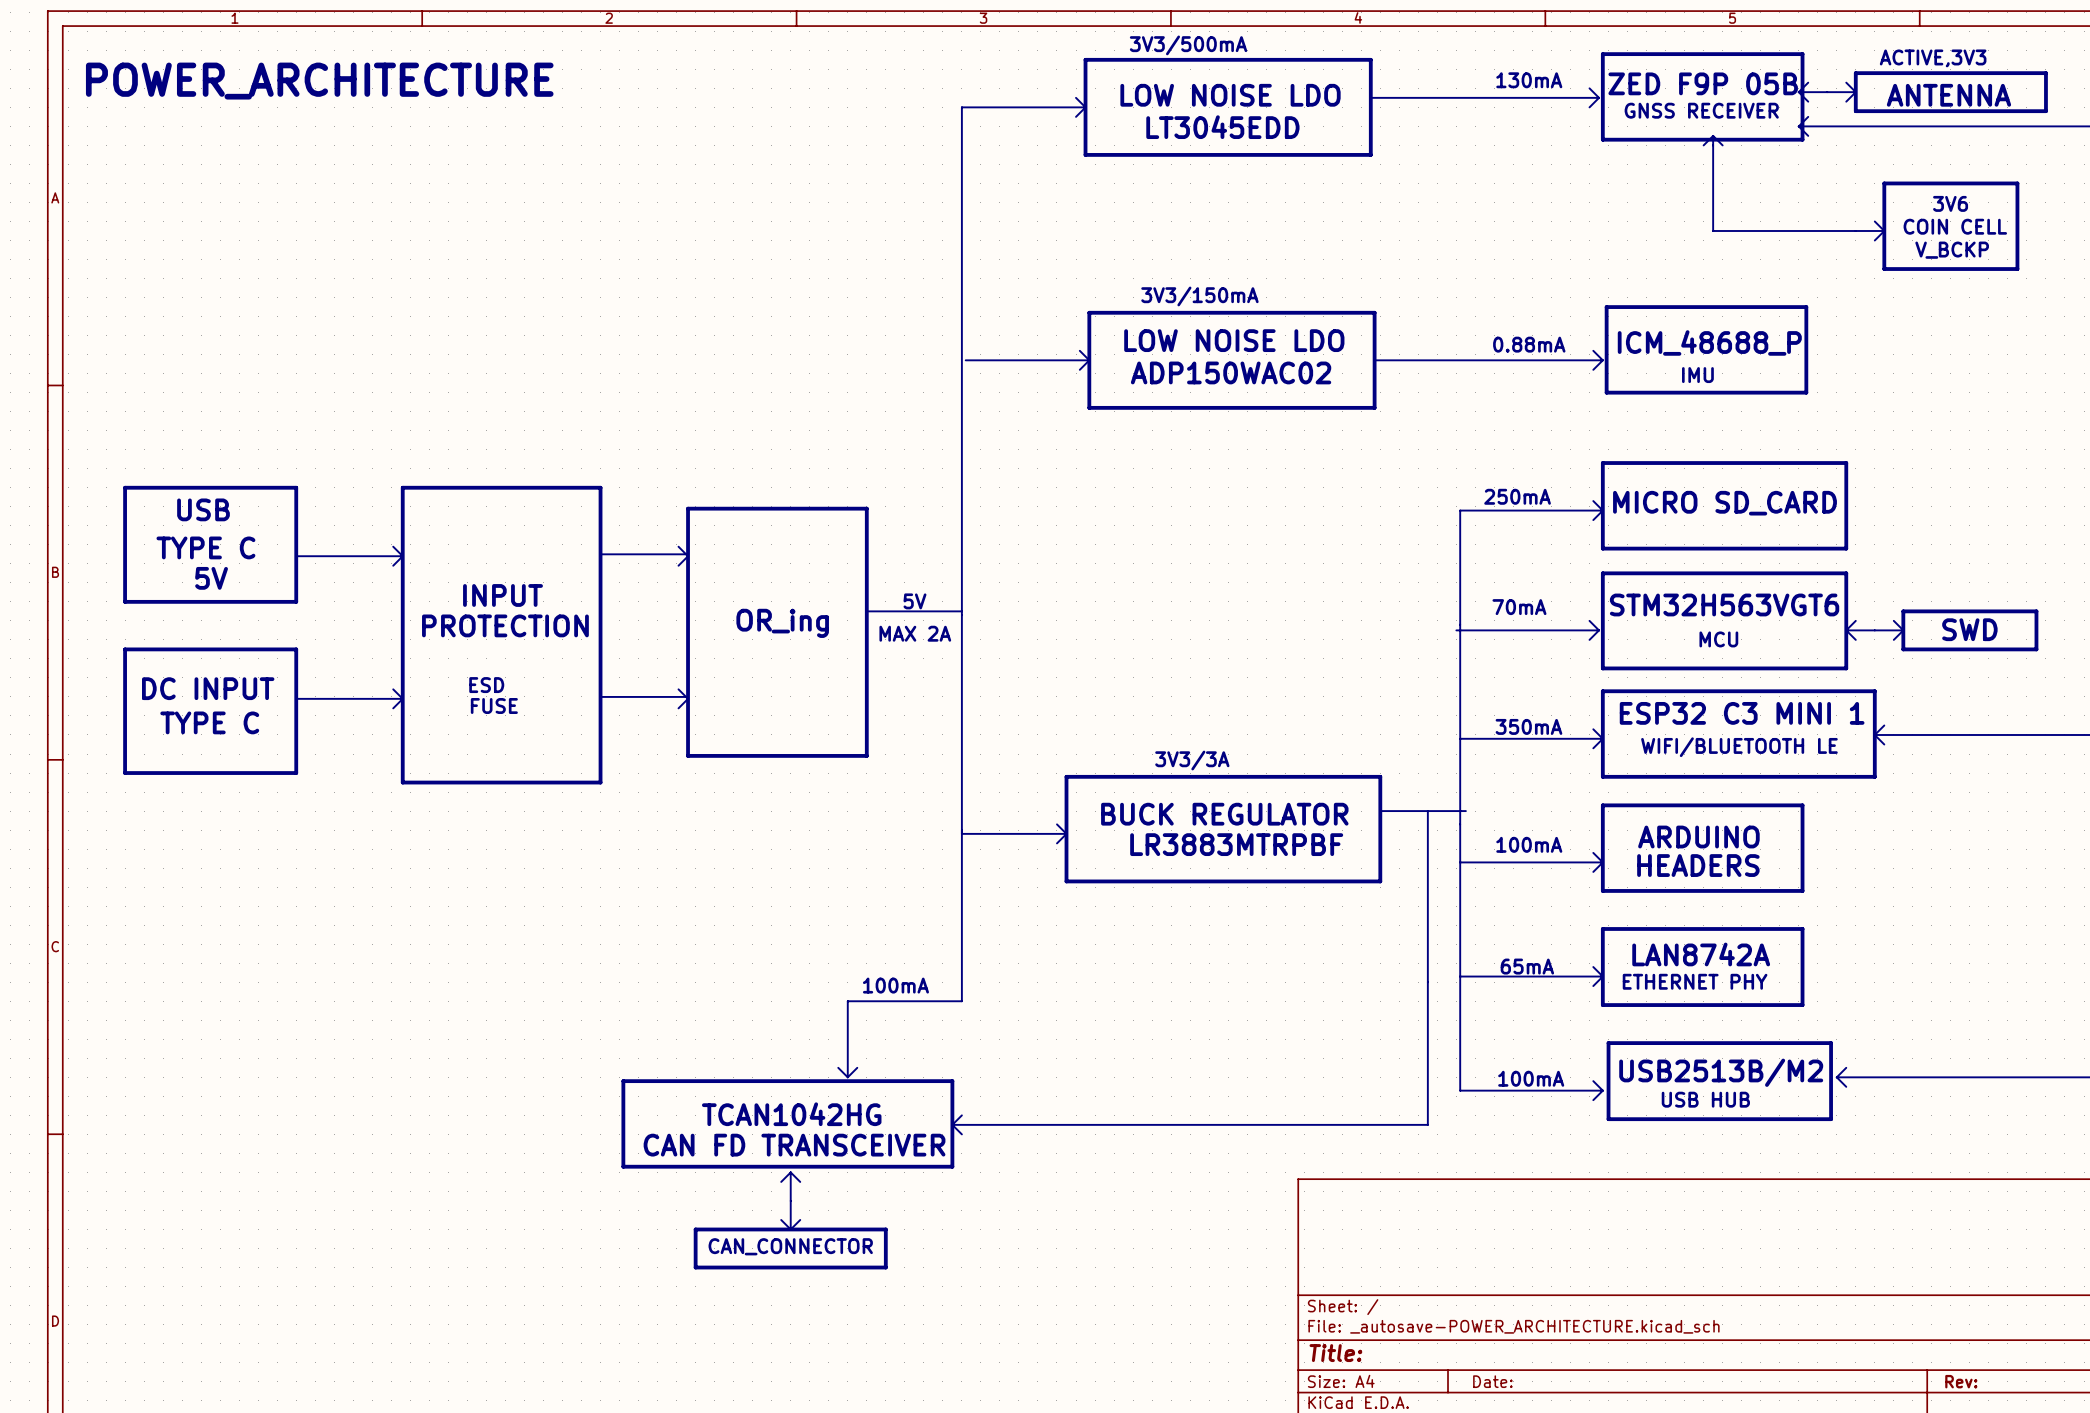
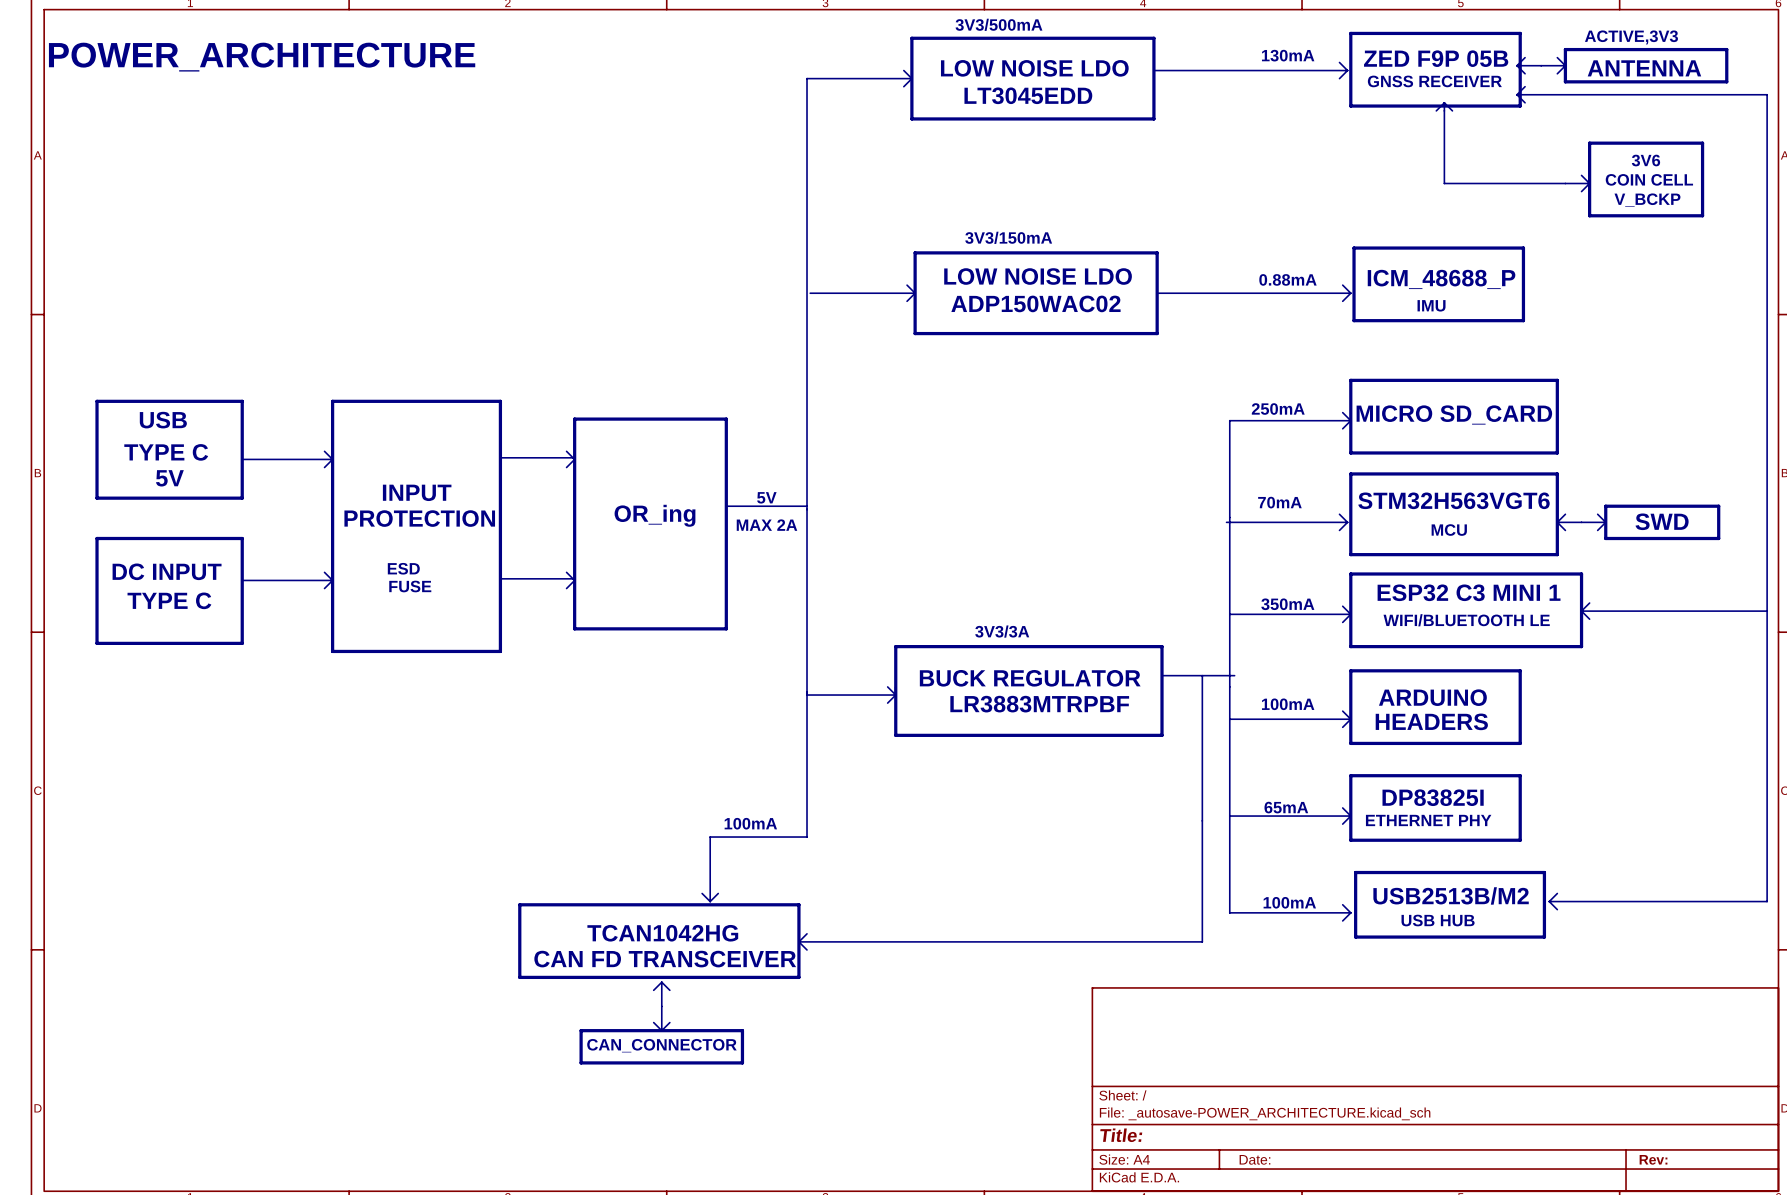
text: LAN8742A (1701, 954) -> DP83825I (1433, 797)

